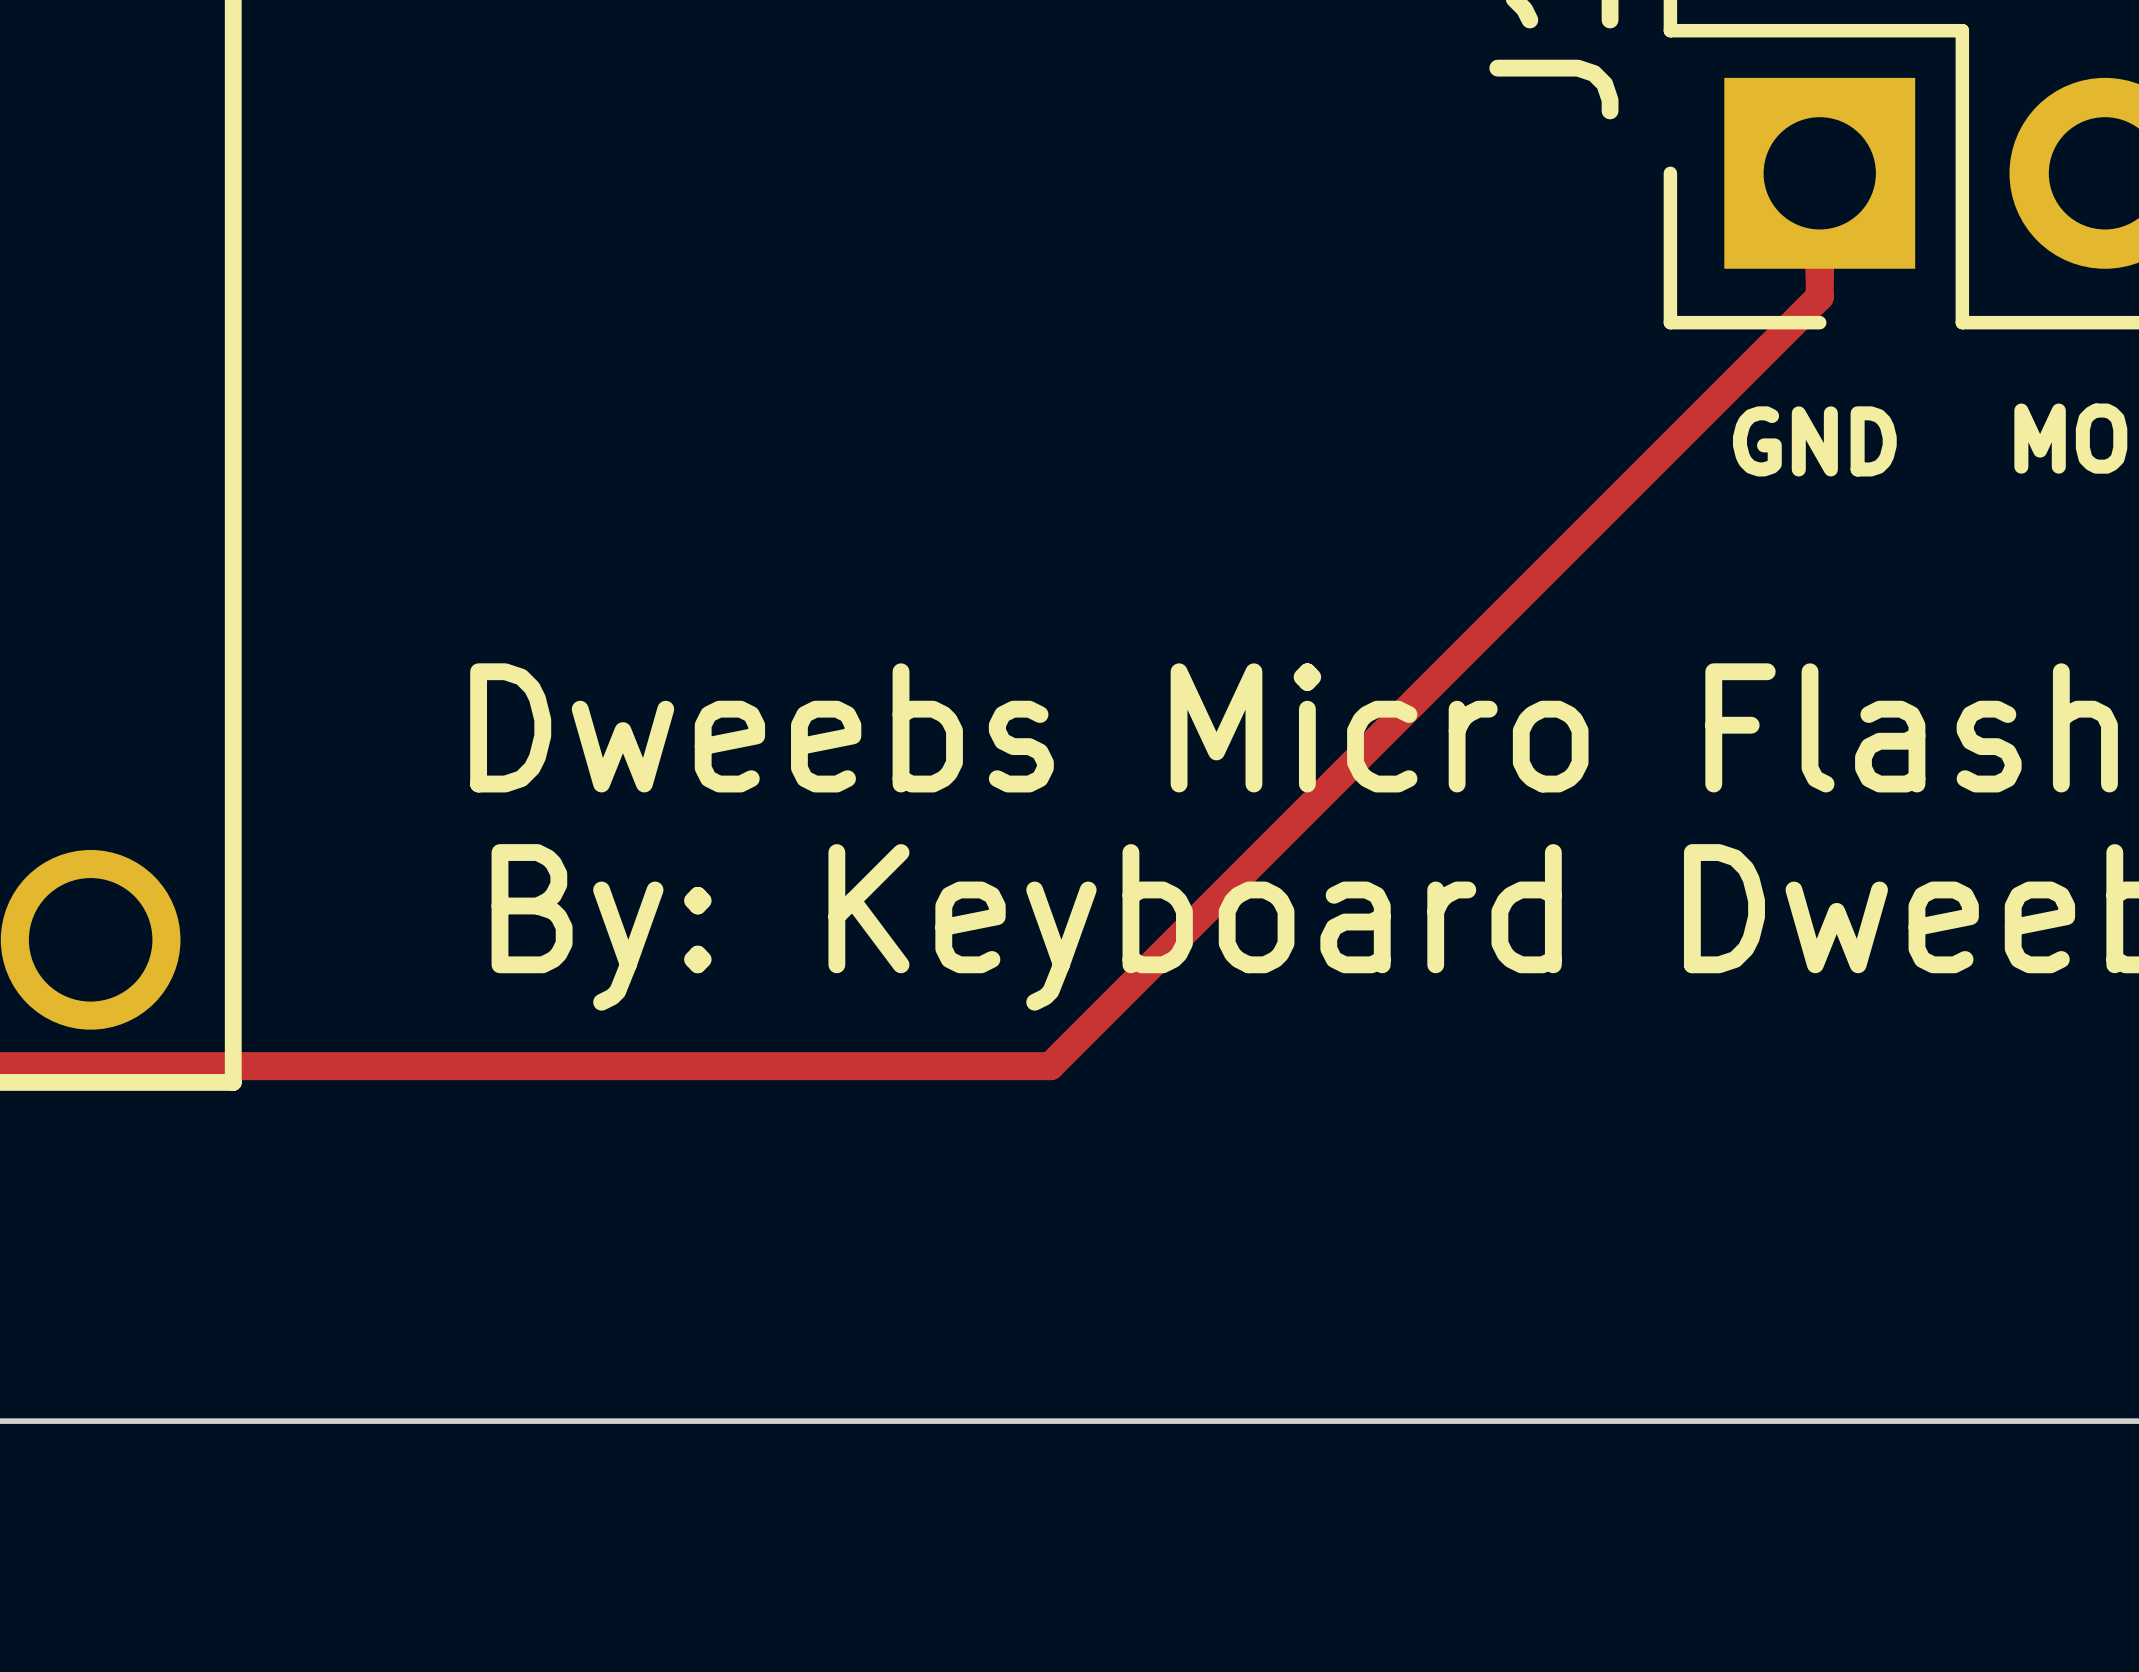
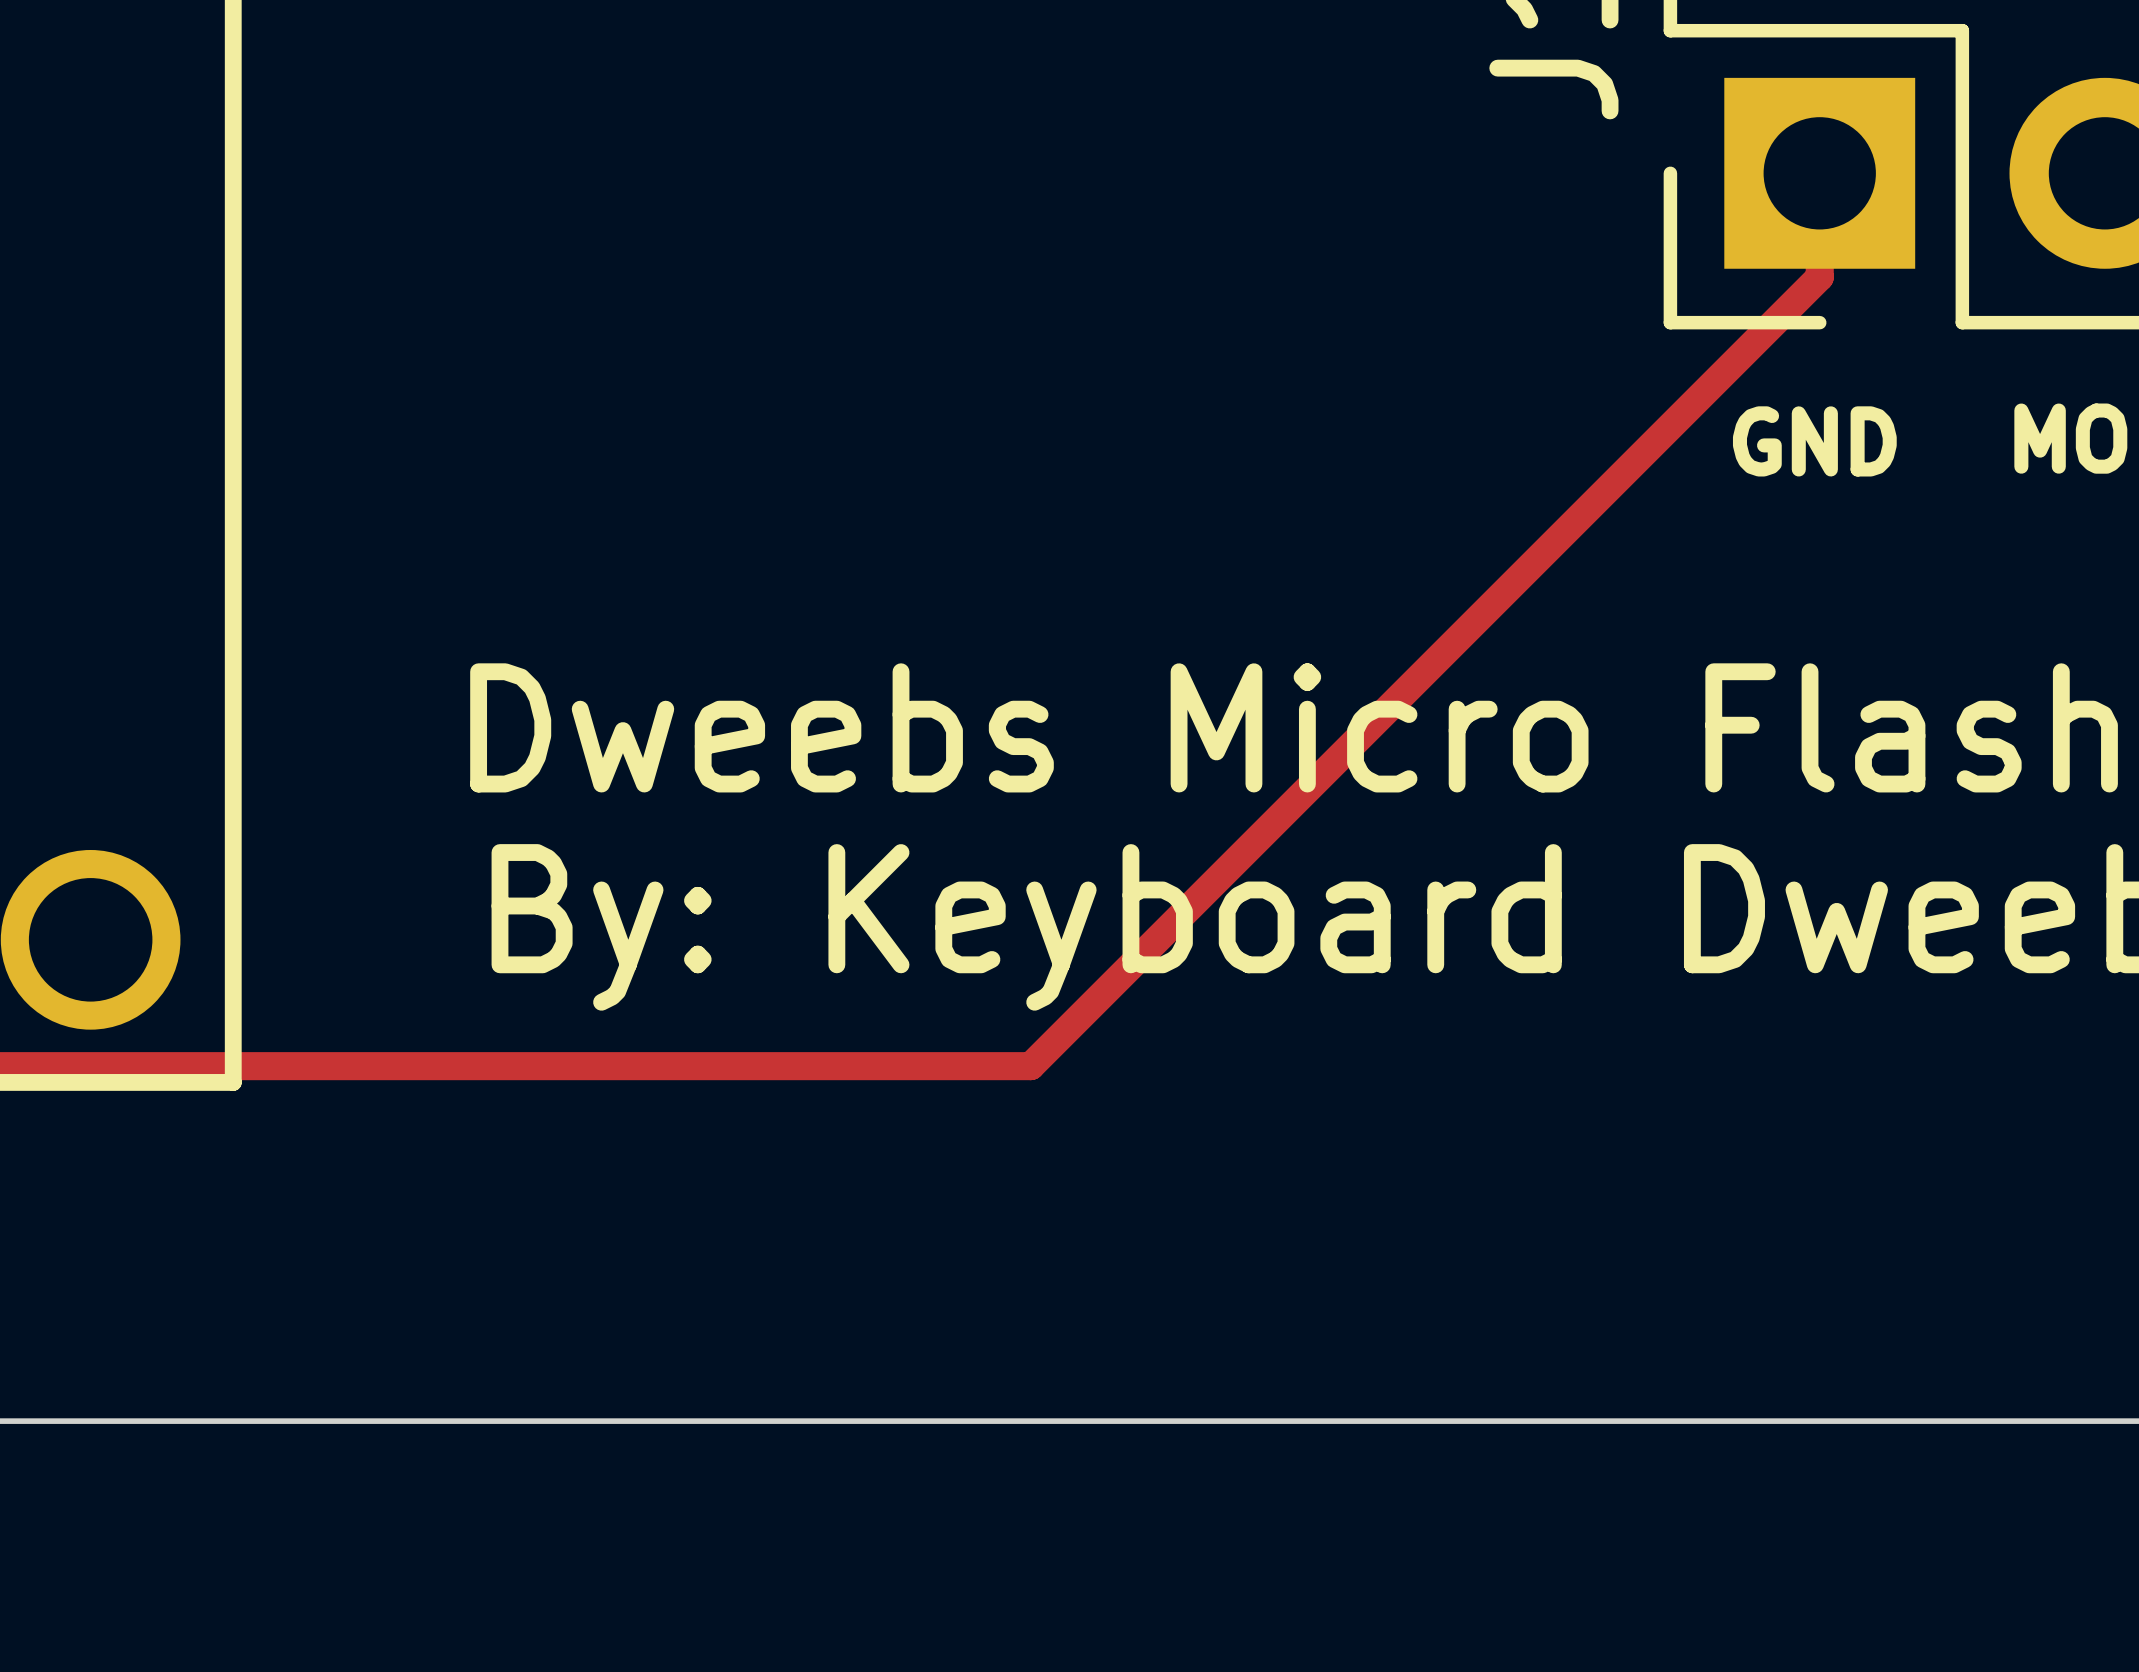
track: (1819, 277) (1819, 296) (1050, 1066) (1030, 1066) -> (1819, 277) (1030, 1066)

